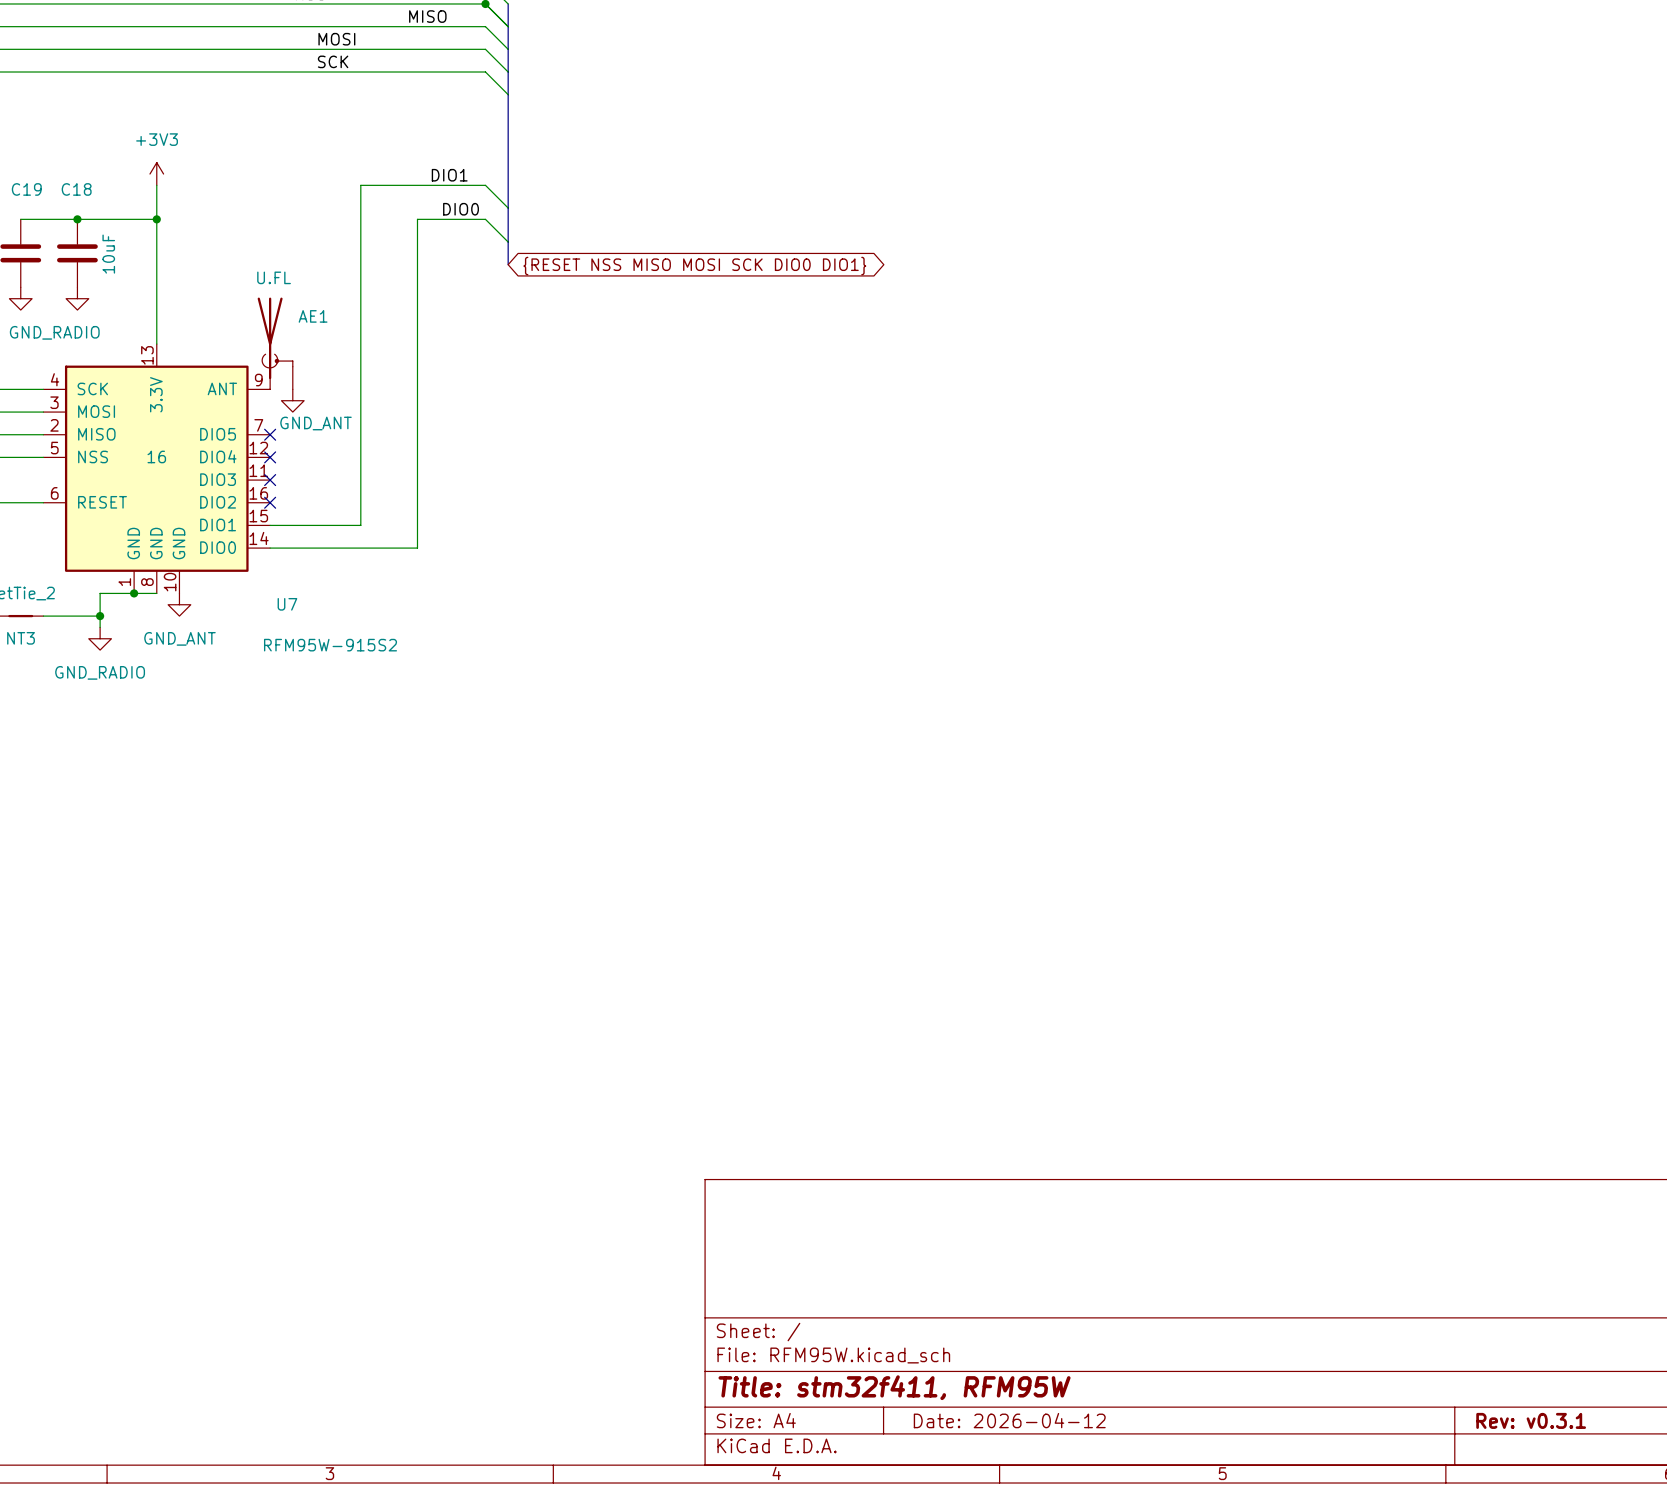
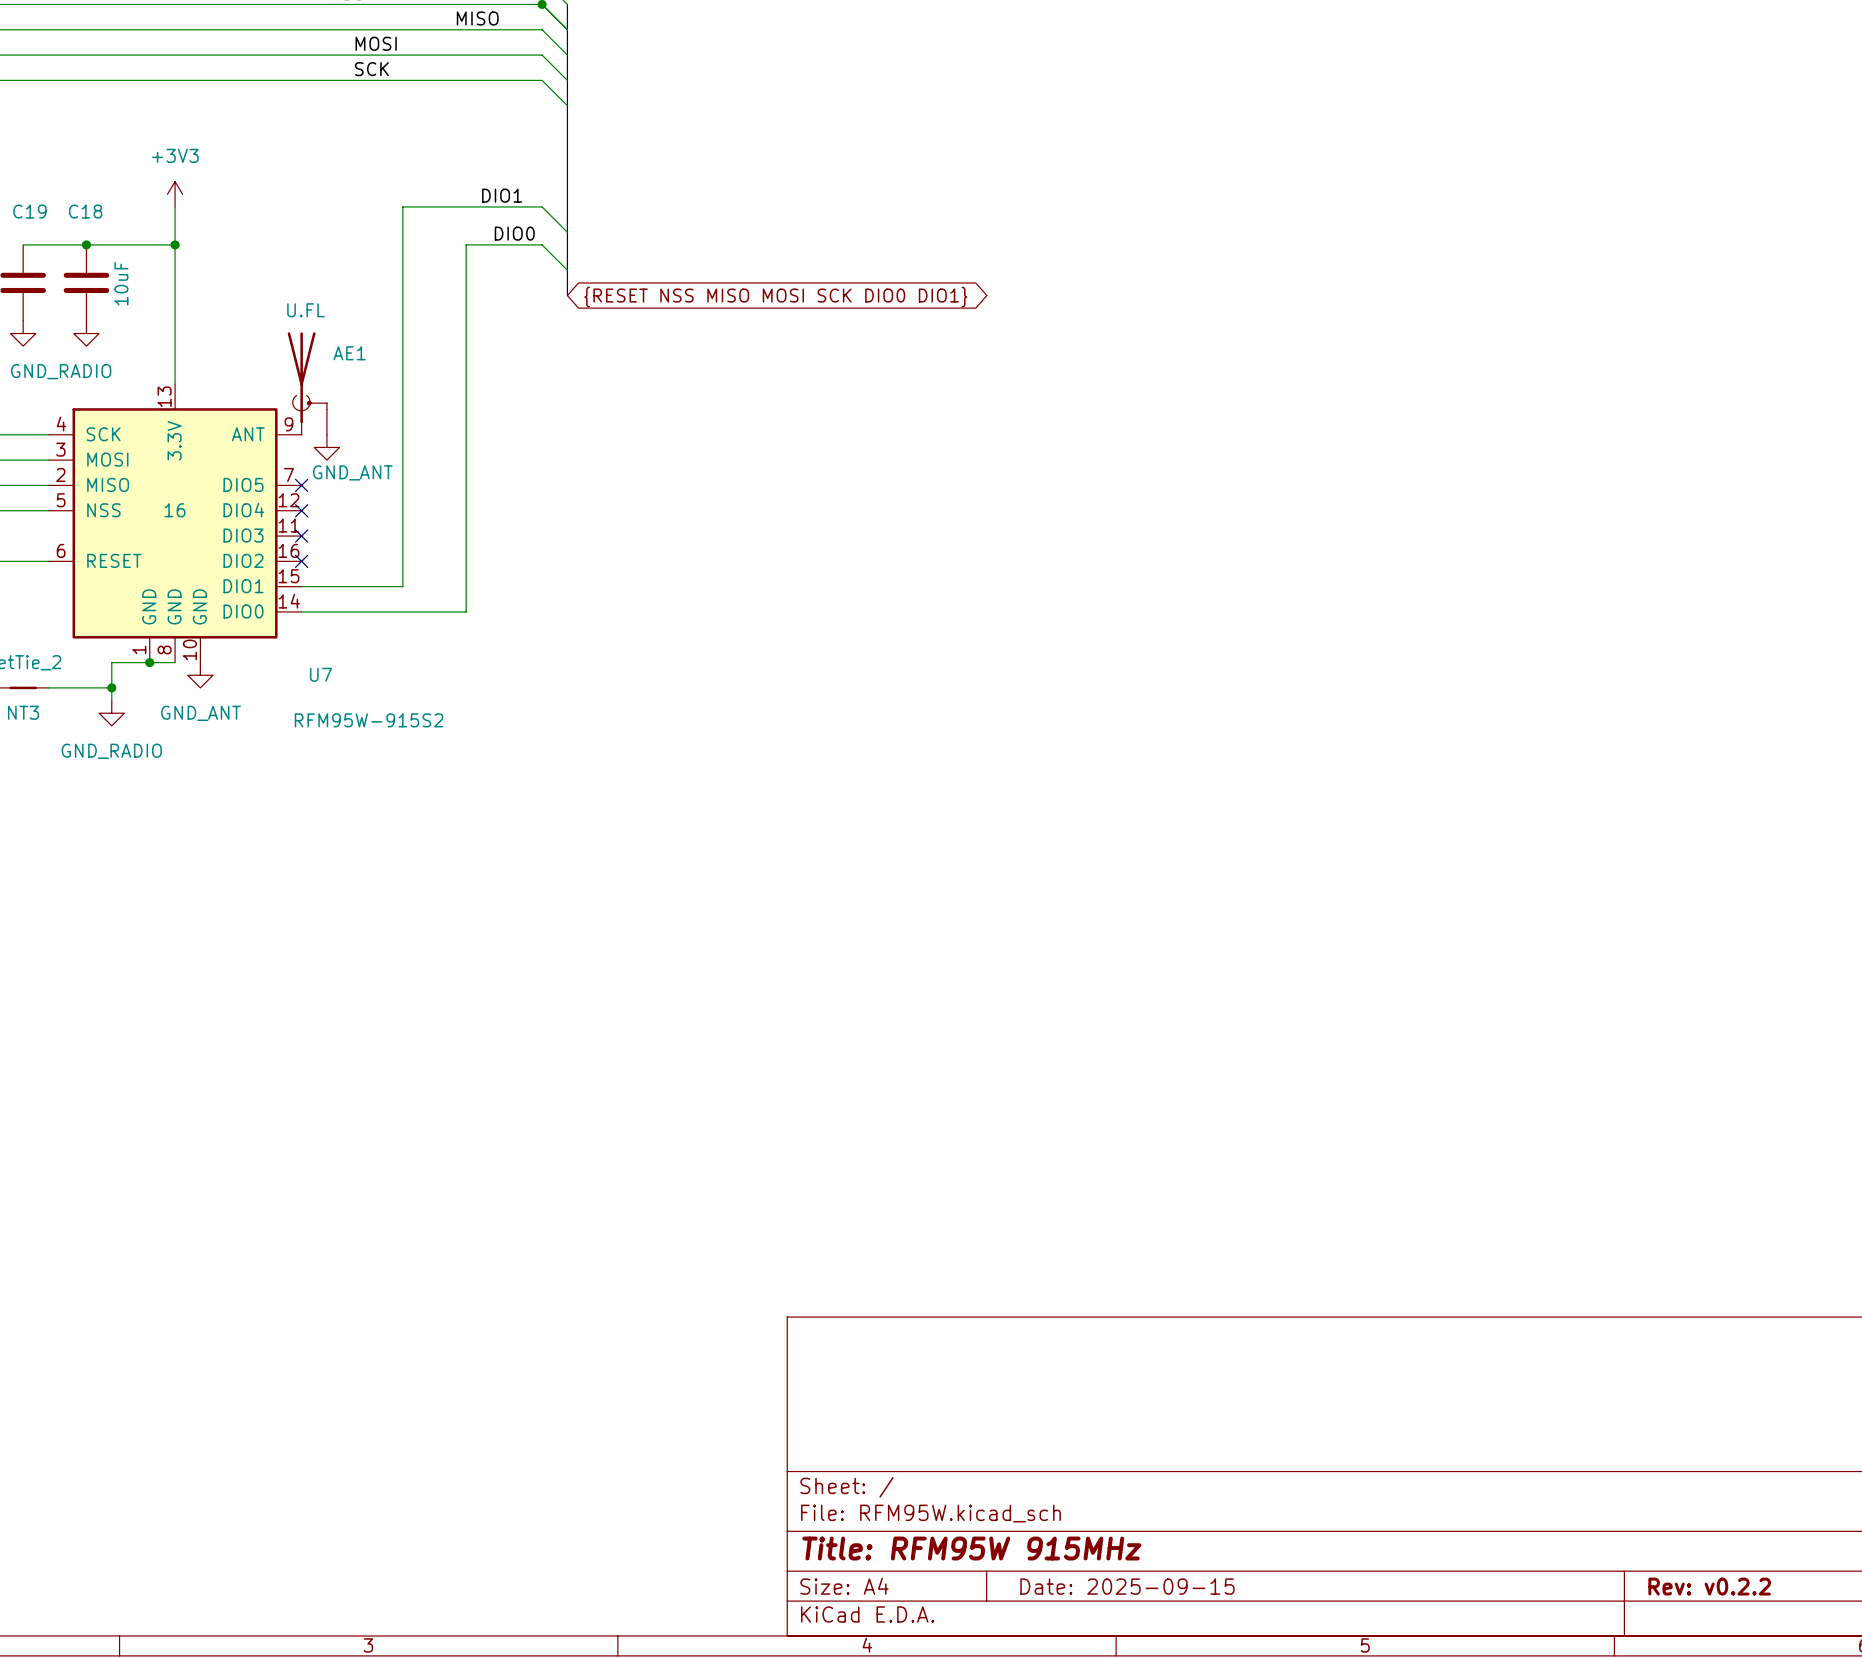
title block: Title: stm32f411, RFM95W (894, 1387) -> Title: RFM95W 915MHz (971, 1548)
title block: Date: 2026-04-12 (1009, 1420) -> Date: 2025-09-15 (1127, 1586)
title block: Rev: v0.3.1 (1531, 1420) -> Rev: v0.2.2 (1709, 1586)

